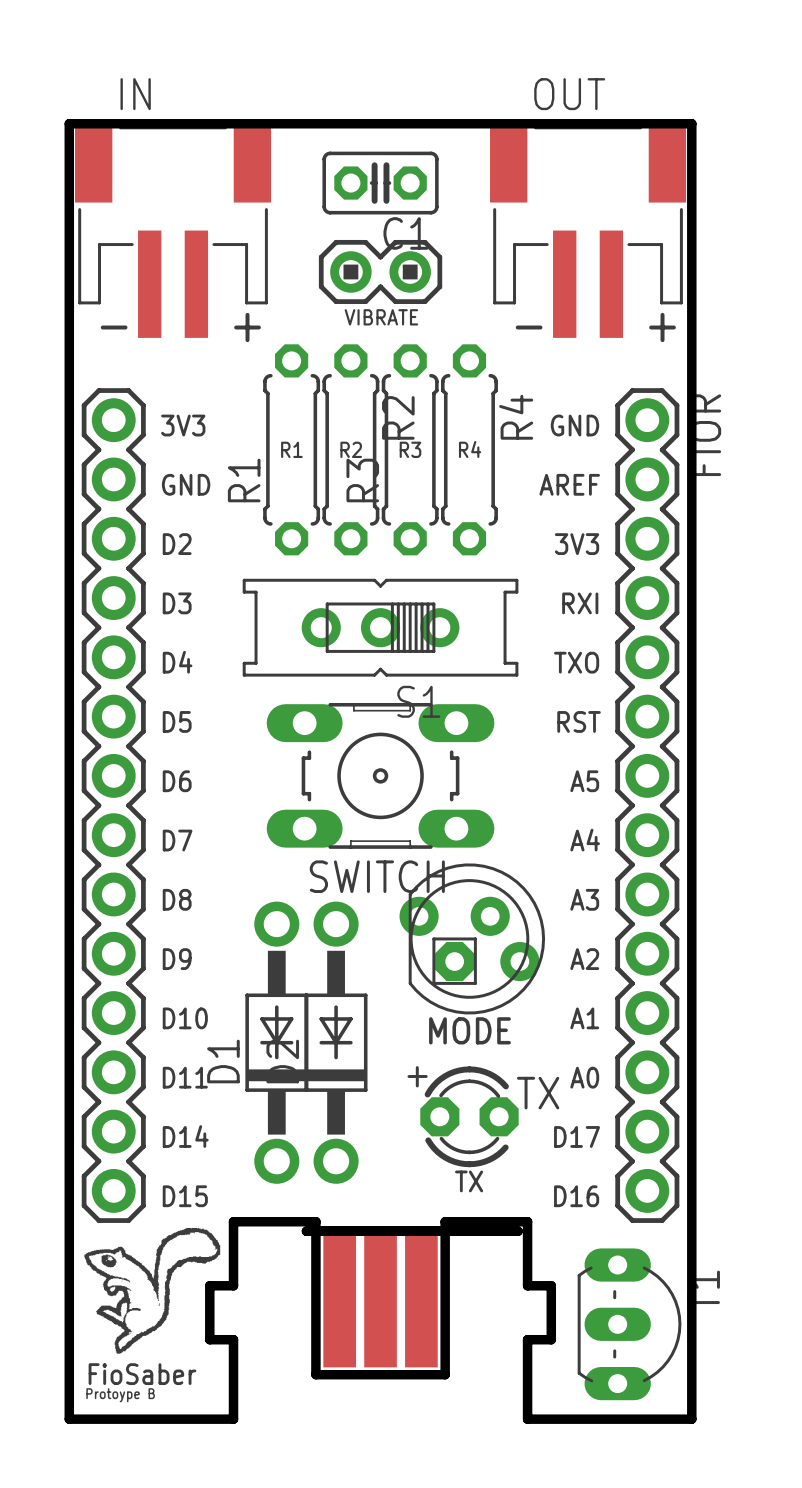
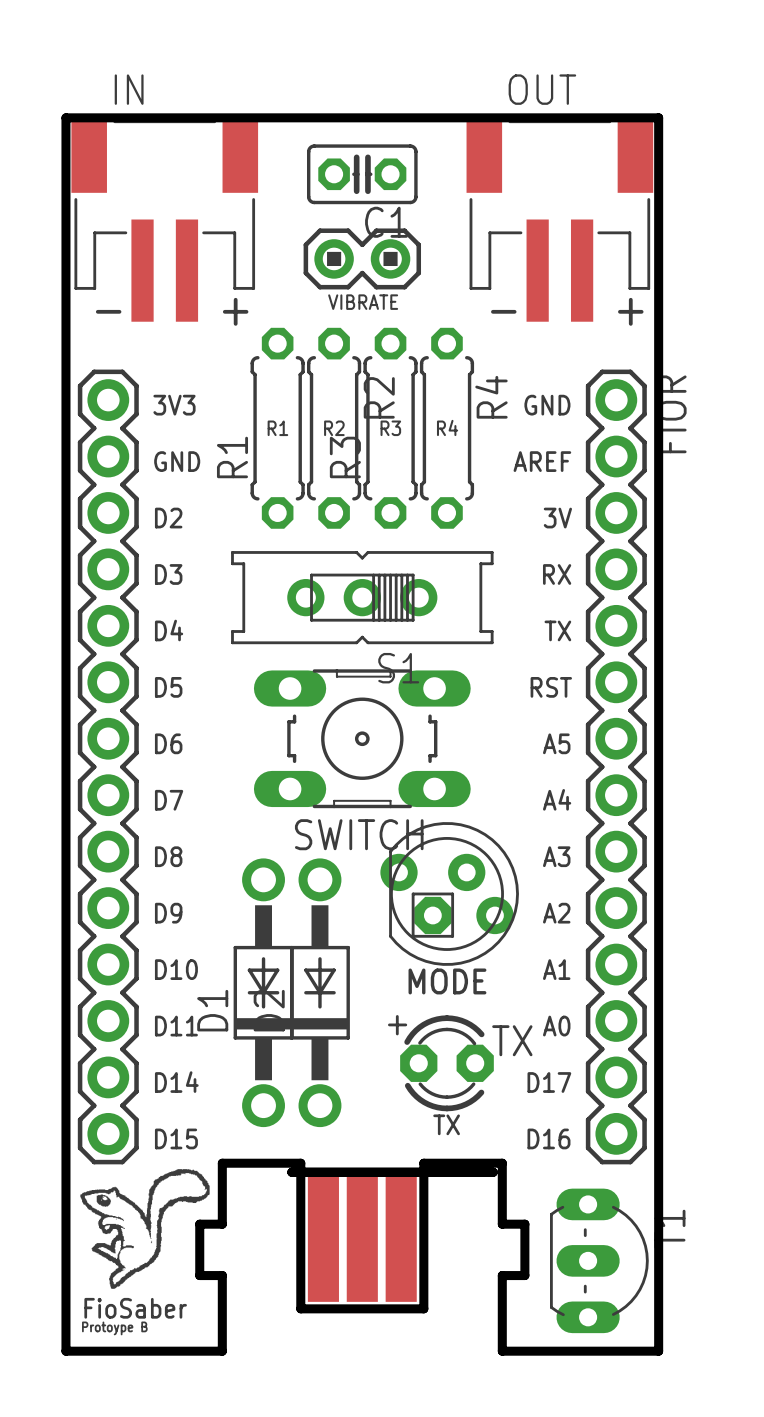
text: 3V3 (577, 544) -> 3V (557, 518)
text: RXI (580, 603) -> RX (557, 574)
text: TXO (576, 662) -> TX (557, 630)

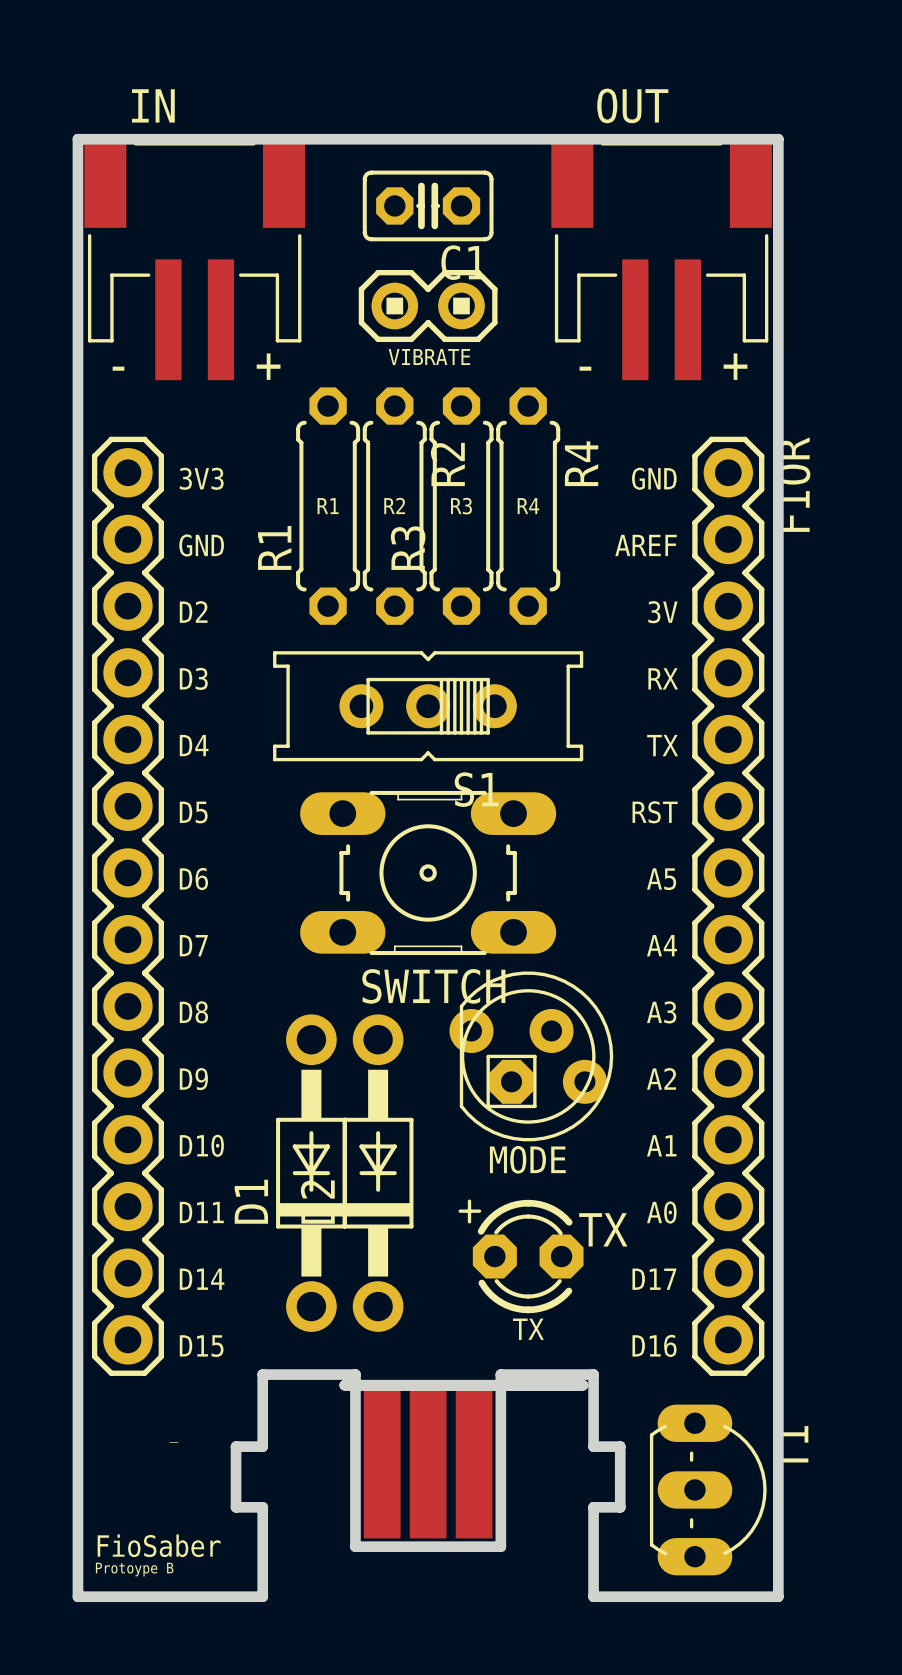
drawing: [80, 1169, 210, 1289] -> none

